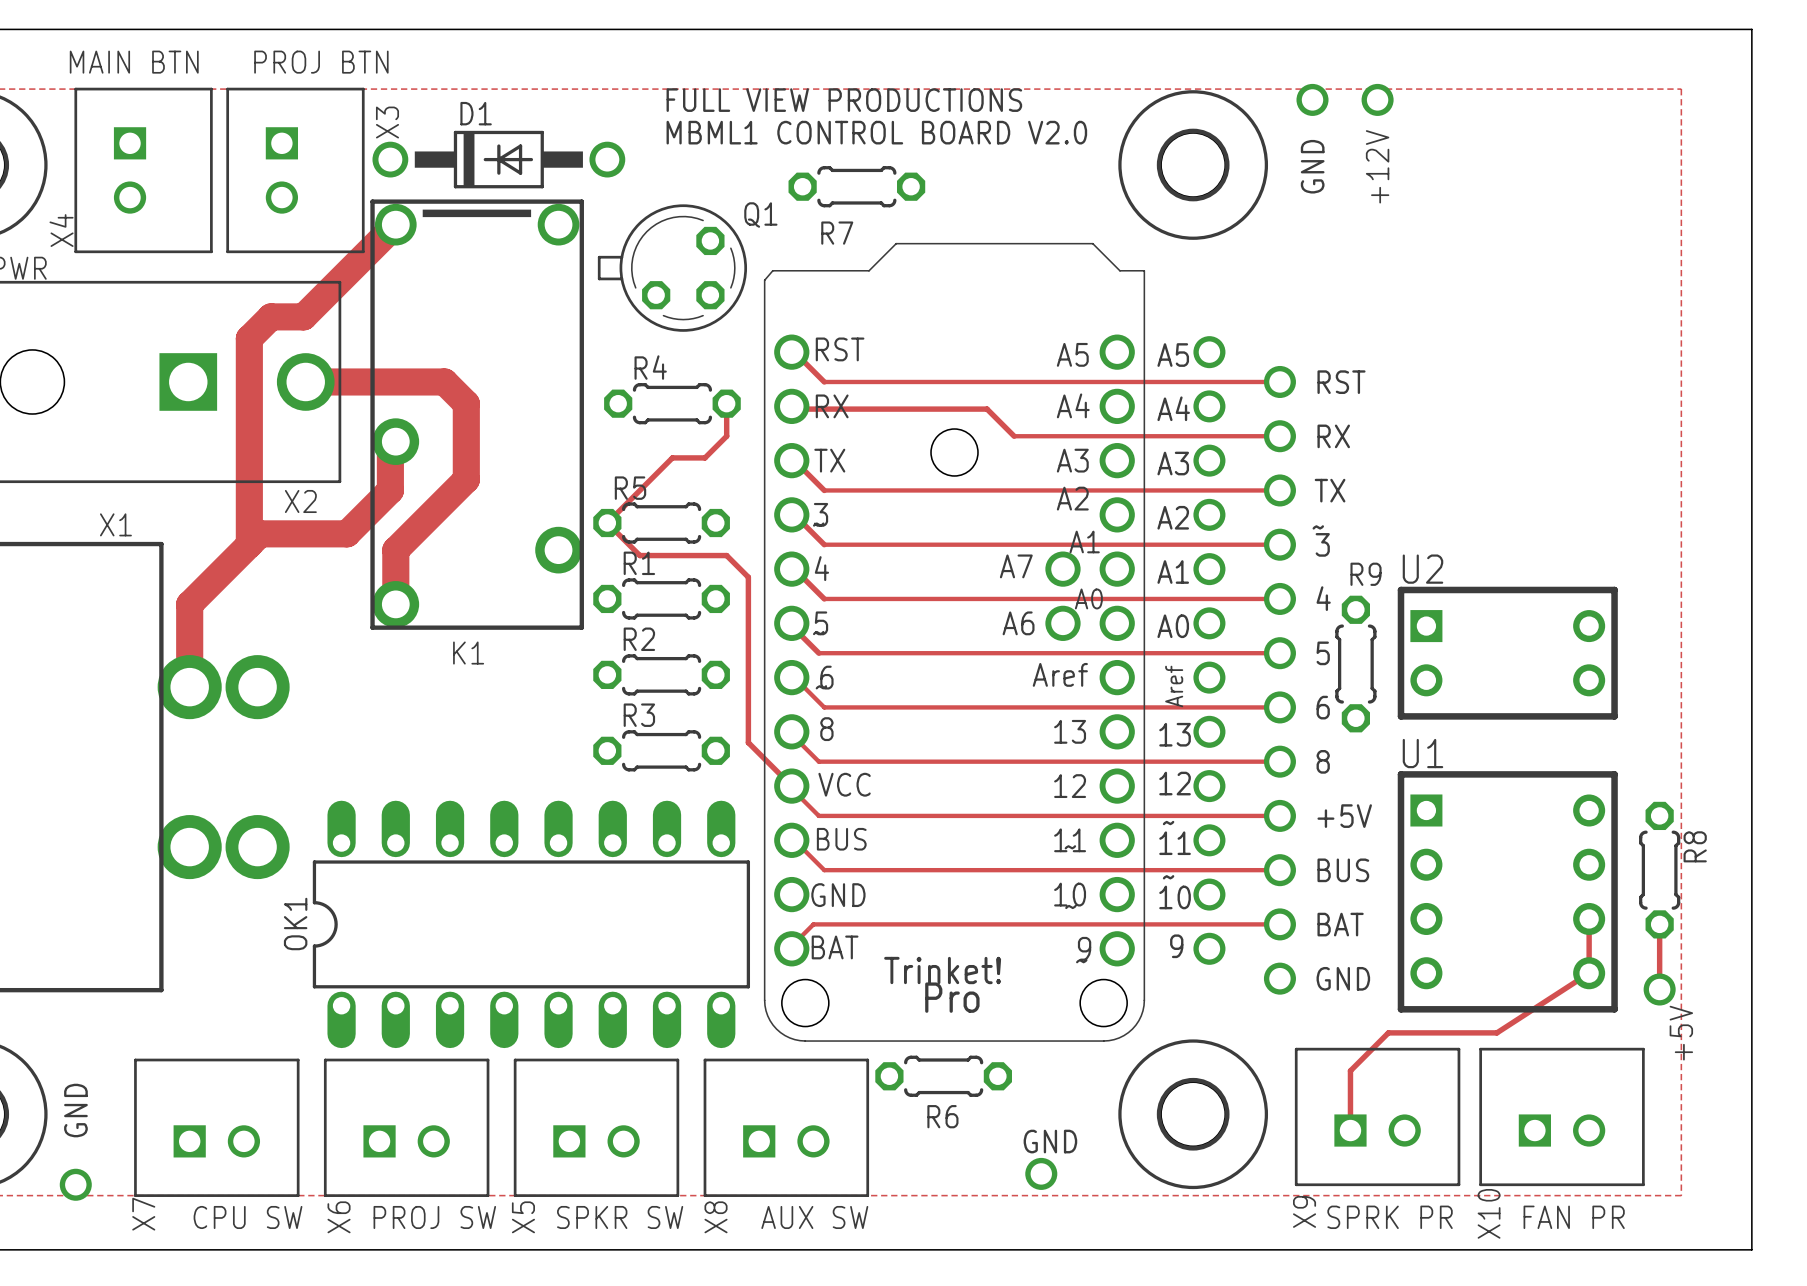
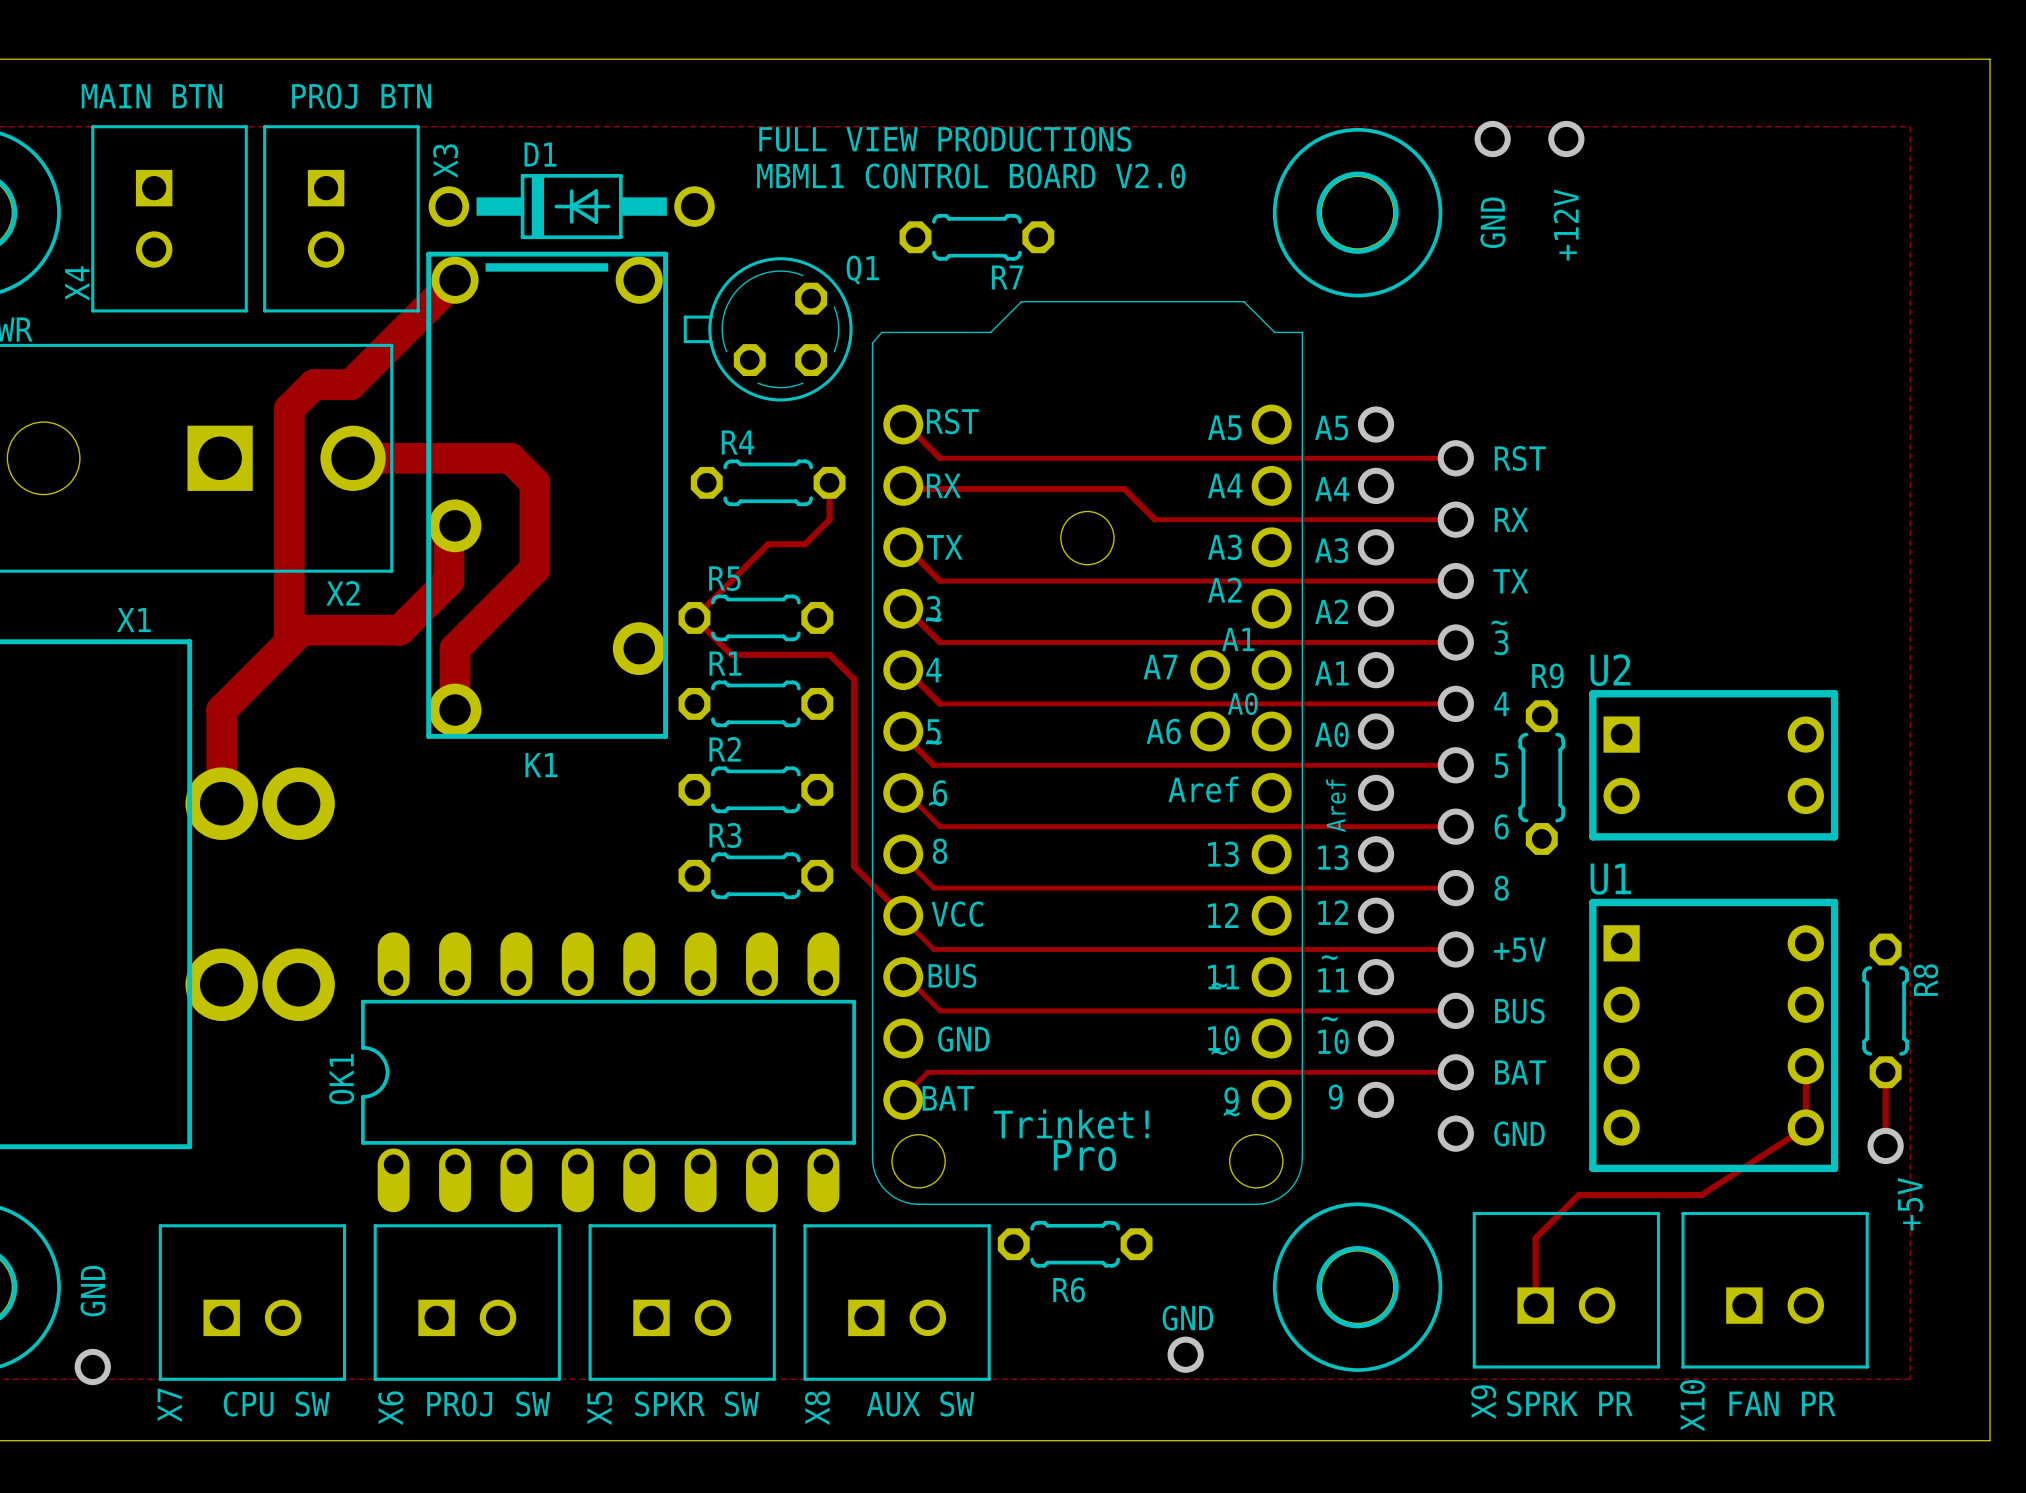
R7 name position: R7 (837, 233) -> R7 (1007, 277)

